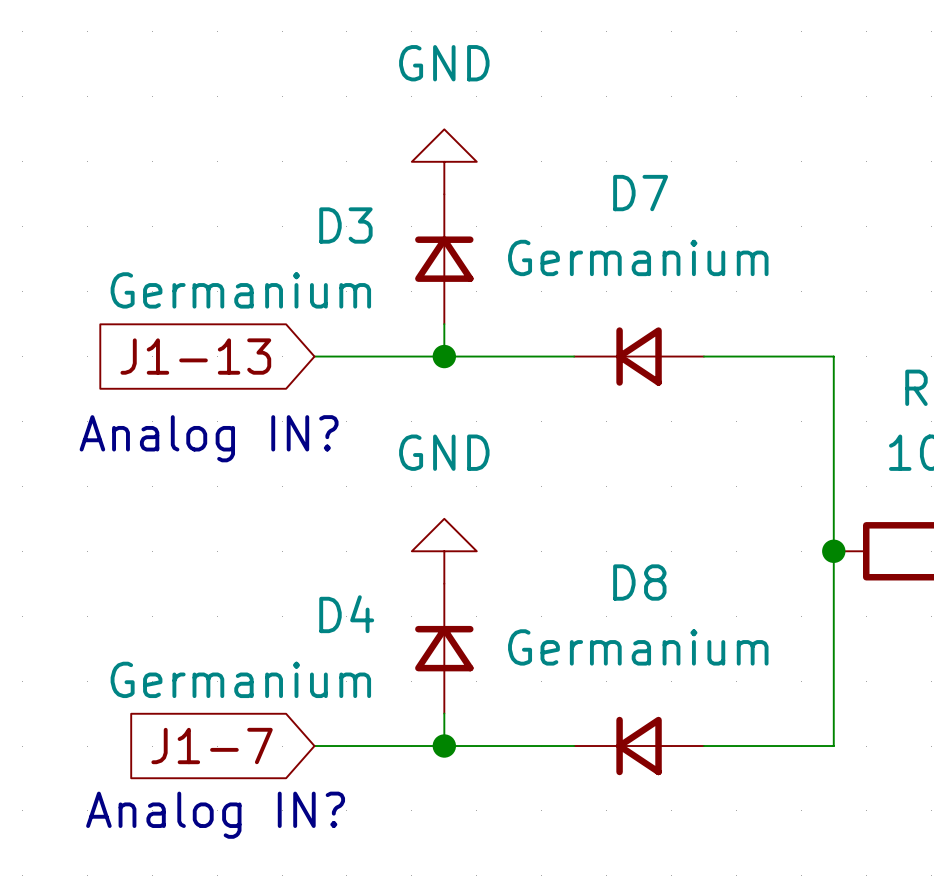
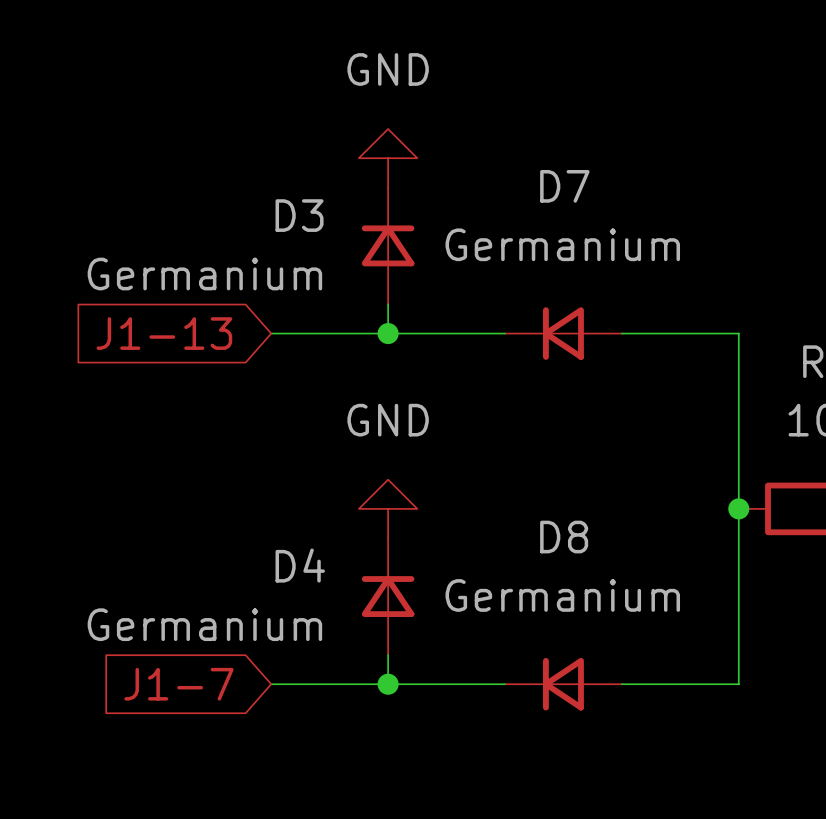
text: Analog IN? (209, 438) -> none
text: Analog IN? (215, 815) -> none

